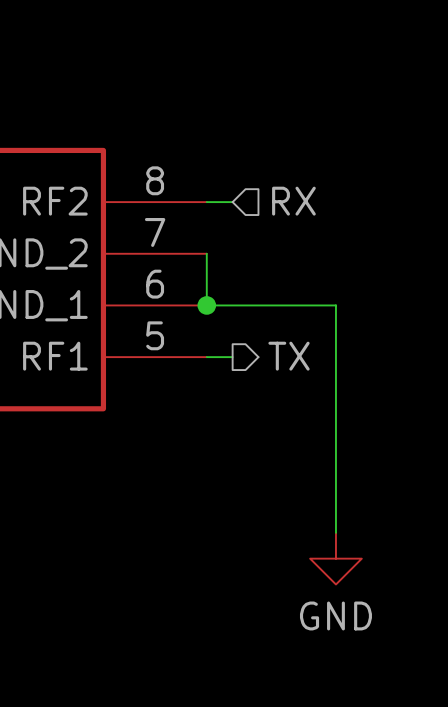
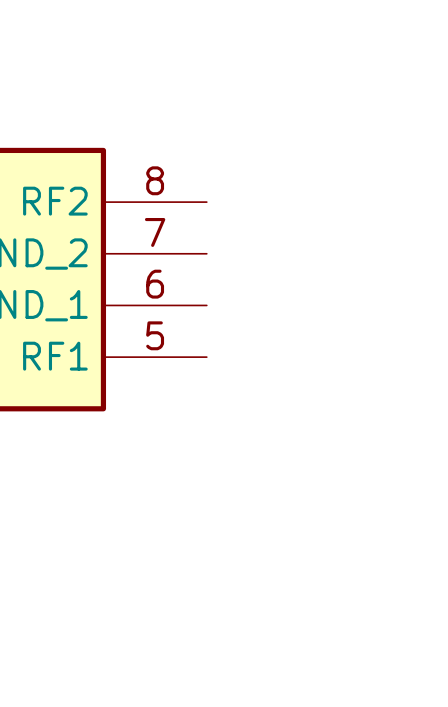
hierarchical label: RX (293, 201) -> none
wire: (206, 202) (232, 202) -> none
wire: (206, 253) (206, 305) (335, 305) (335, 532) -> none
junction: (206, 305) -> none
hierarchical label: TX (289, 356) -> none
wire: (206, 357) (232, 357) -> none
power symbol: GND (335, 558) -> none

